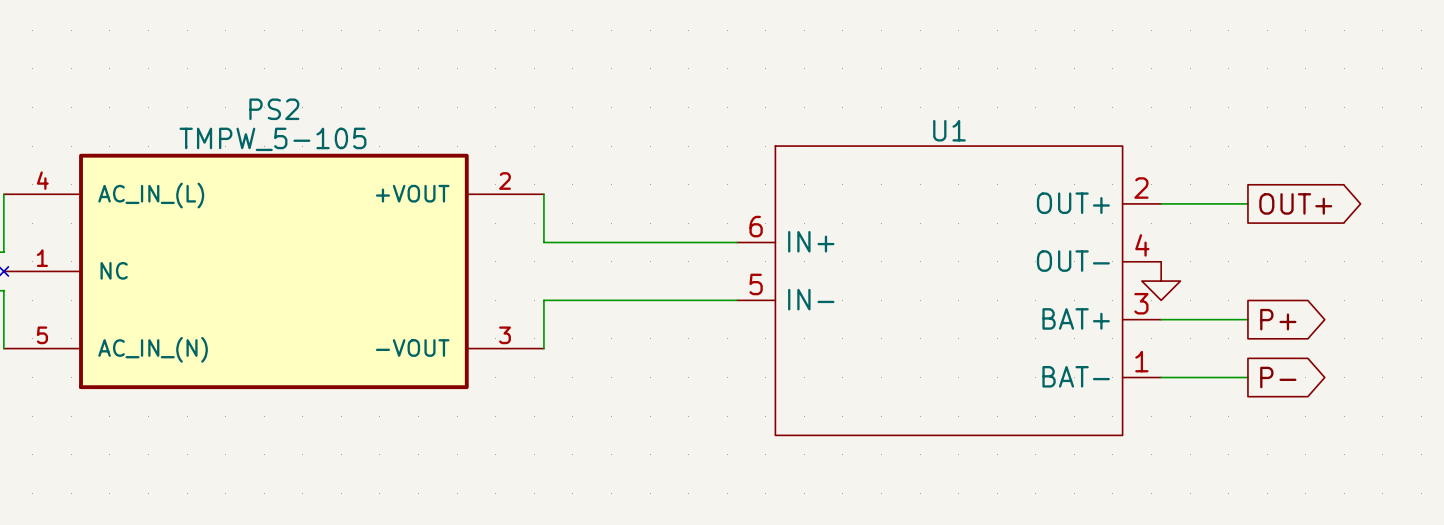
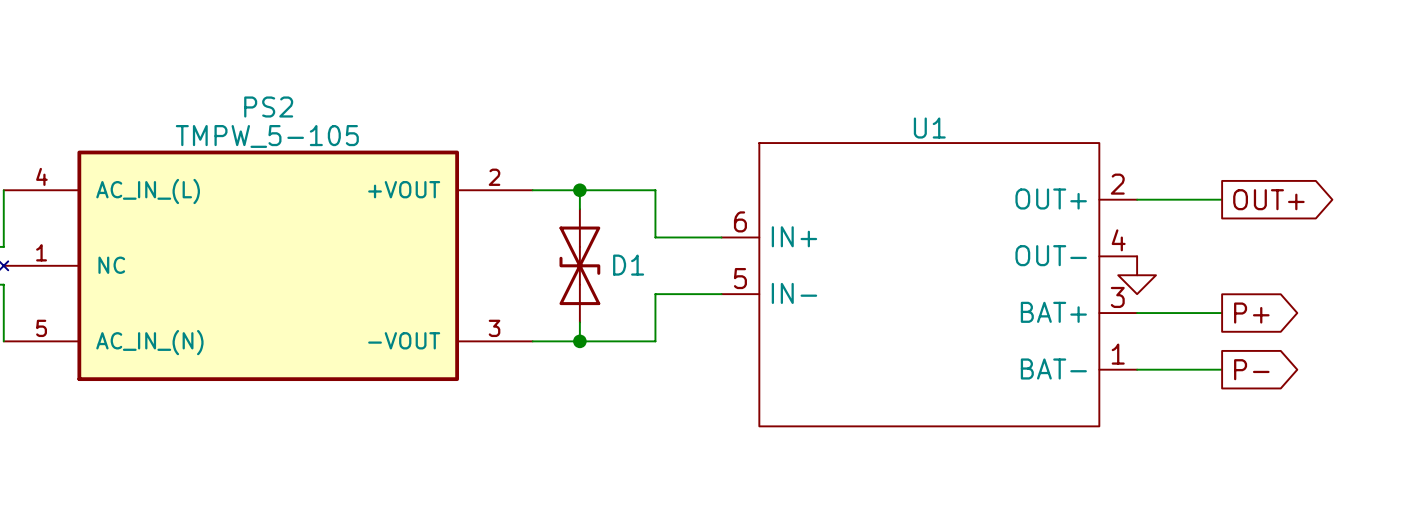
wire: (543, 194) (543, 242) (669, 242) -> (532, 190) (655, 190) (655, 237)
wire: none -> (579, 190) (579, 209)
junction: none -> (579, 190)
D1: none -> (579, 265)
wire: (669, 300) (543, 300) (543, 348) -> (655, 294) (655, 341) (532, 341)
wire: none -> (579, 322) (579, 341)
junction: none -> (579, 341)

